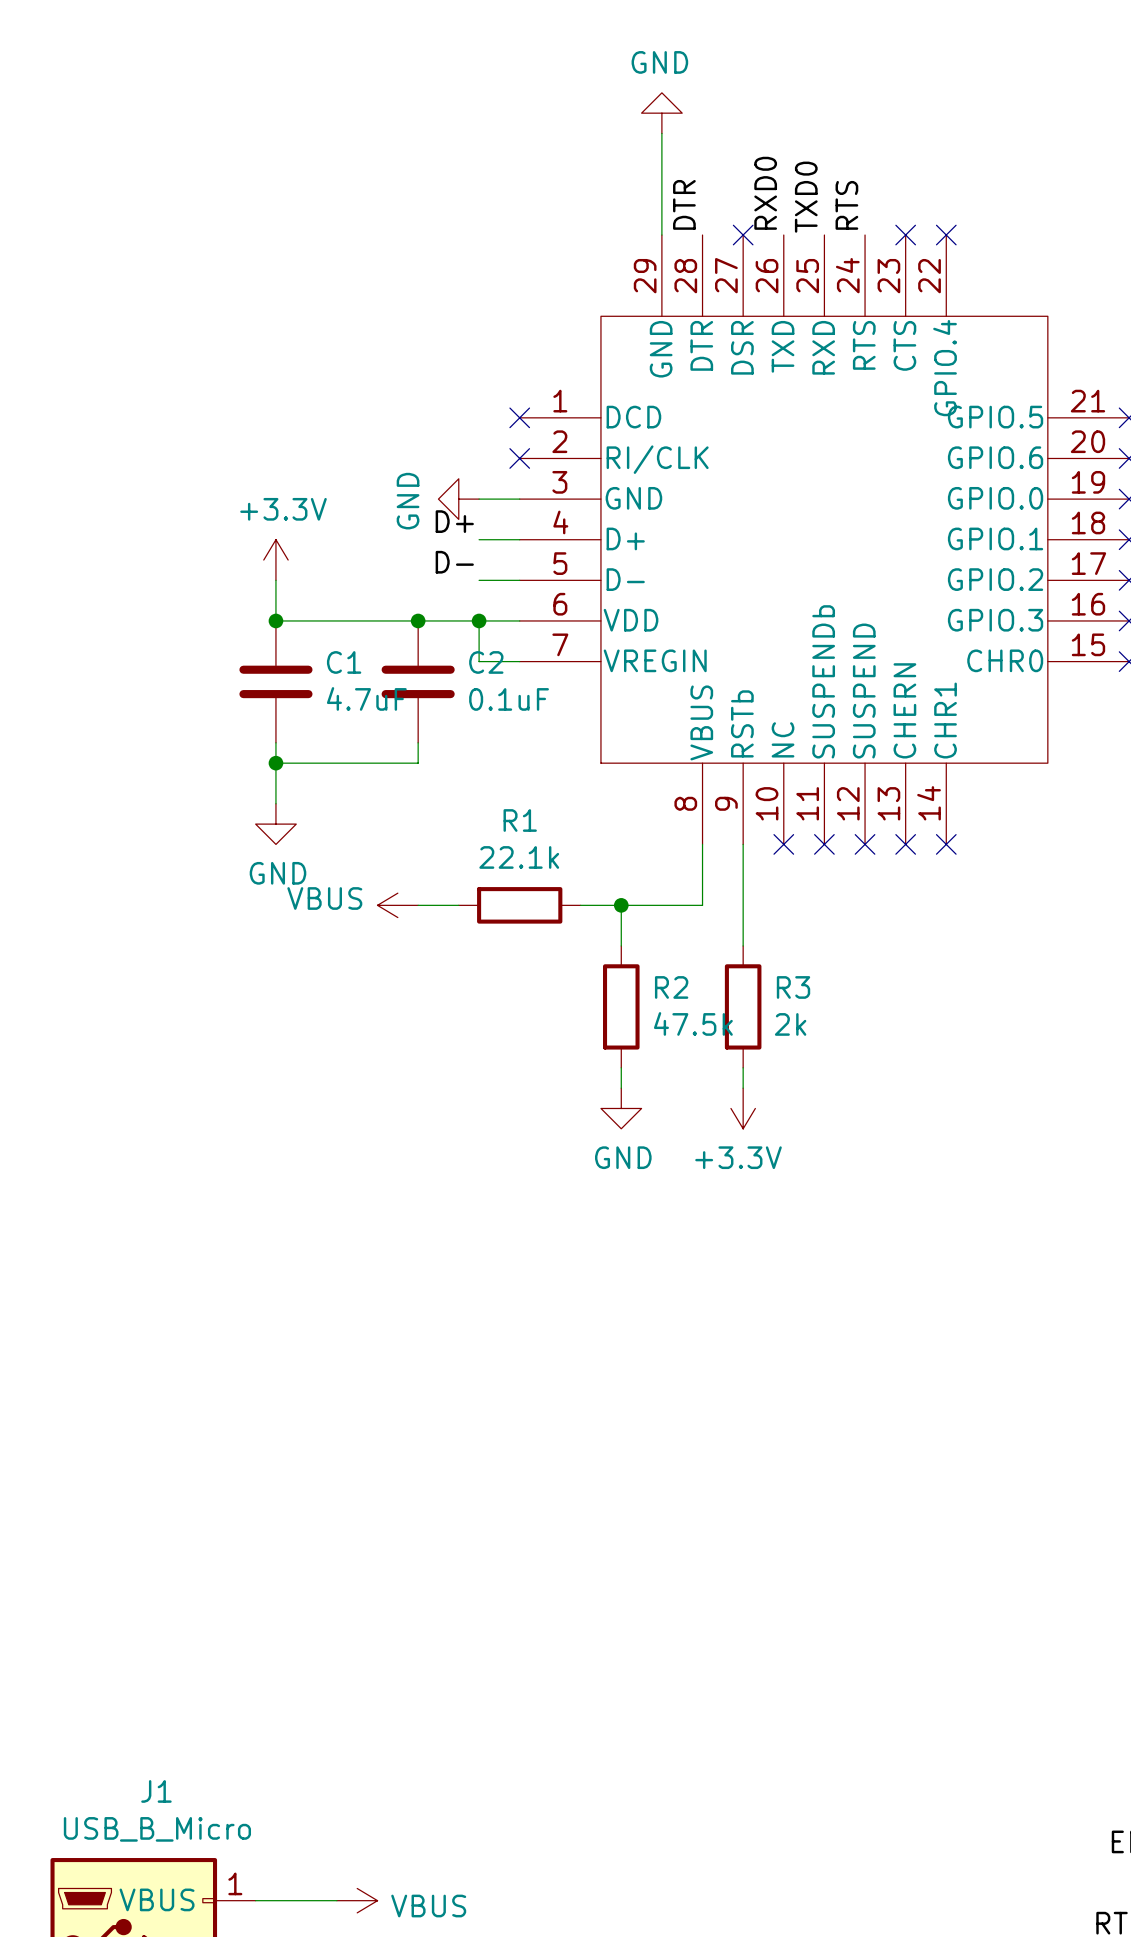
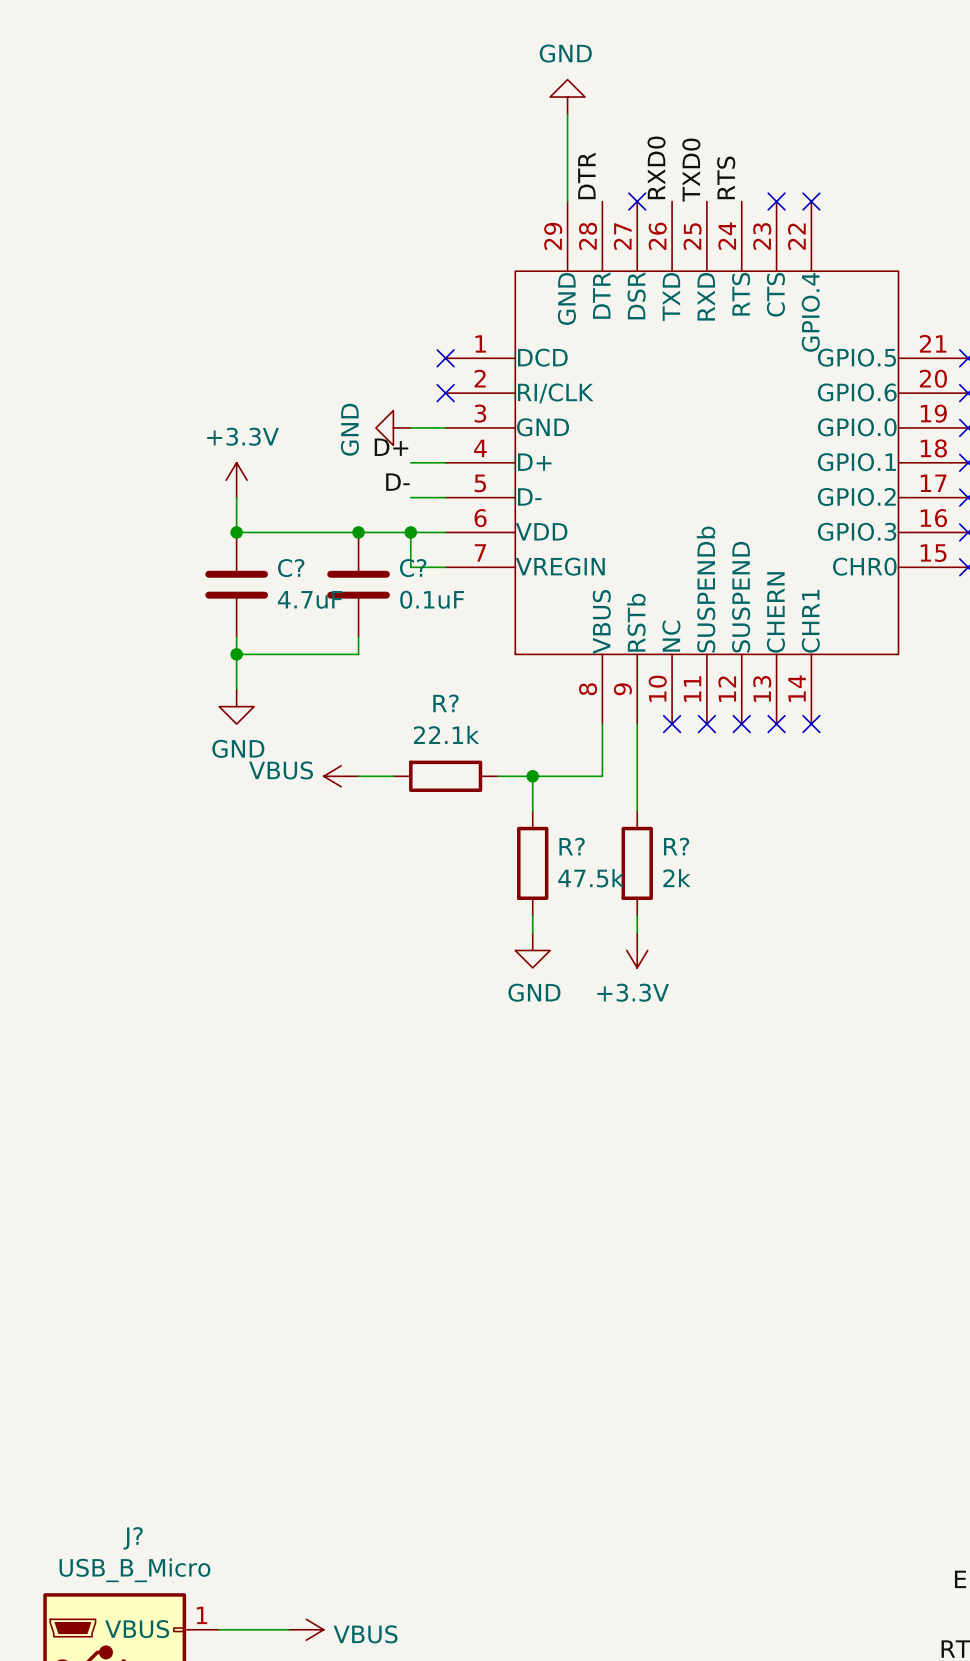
C1 name: C1 (344, 662) -> C? (291, 568)
C2 name: C2 (486, 662) -> C? (413, 568)
R1 name: R1 (520, 820) -> R? (445, 703)
R2 name: R2 (671, 987) -> R? (572, 846)
R3 name: R3 (793, 987) -> R? (676, 846)
J1 name: J1 (156, 1791) -> J? (133, 1538)

